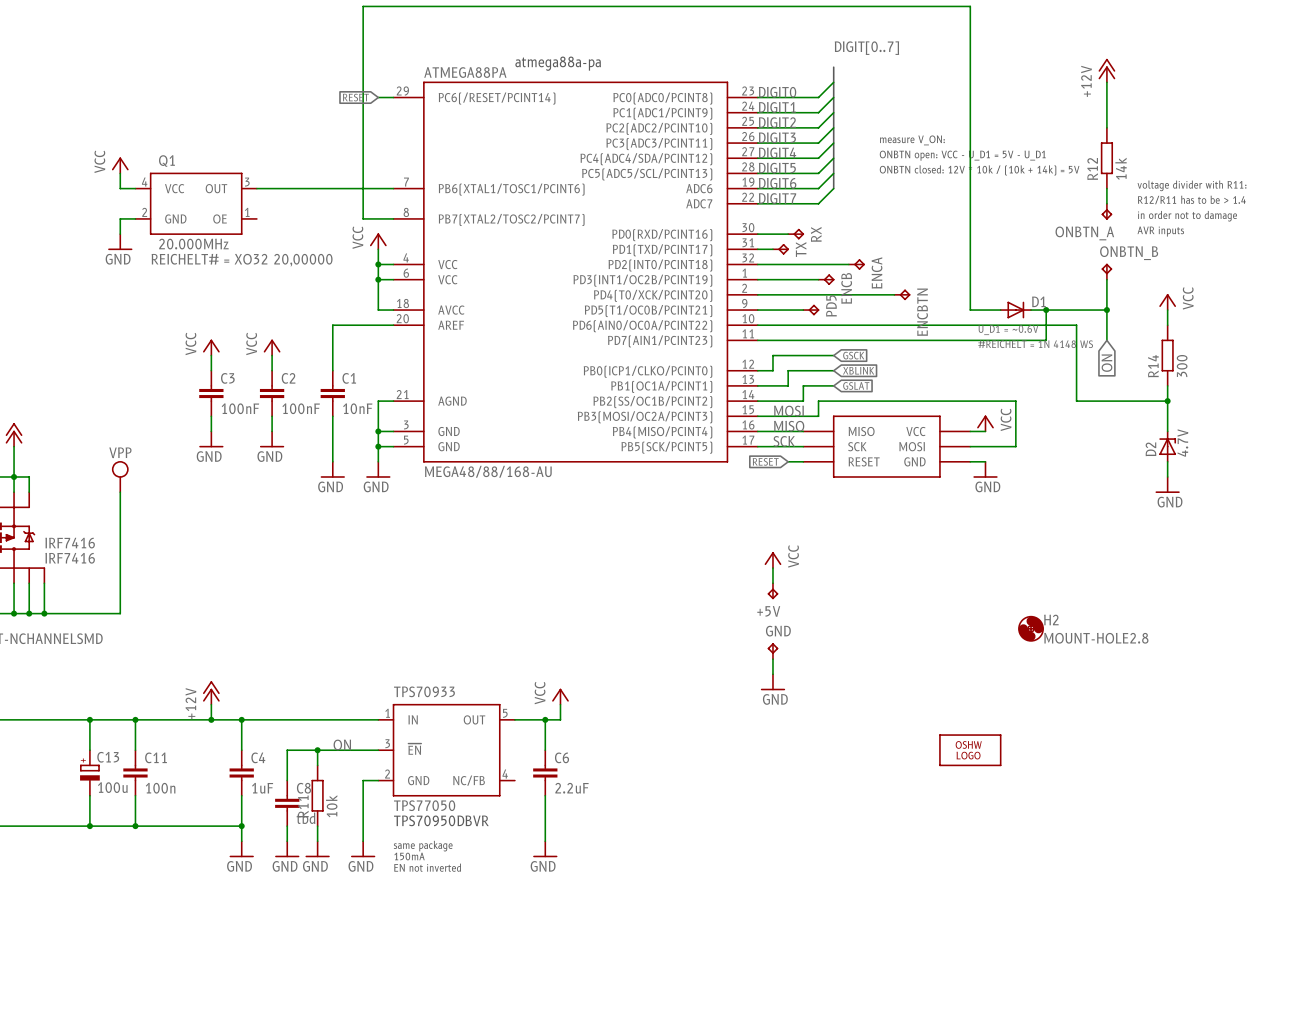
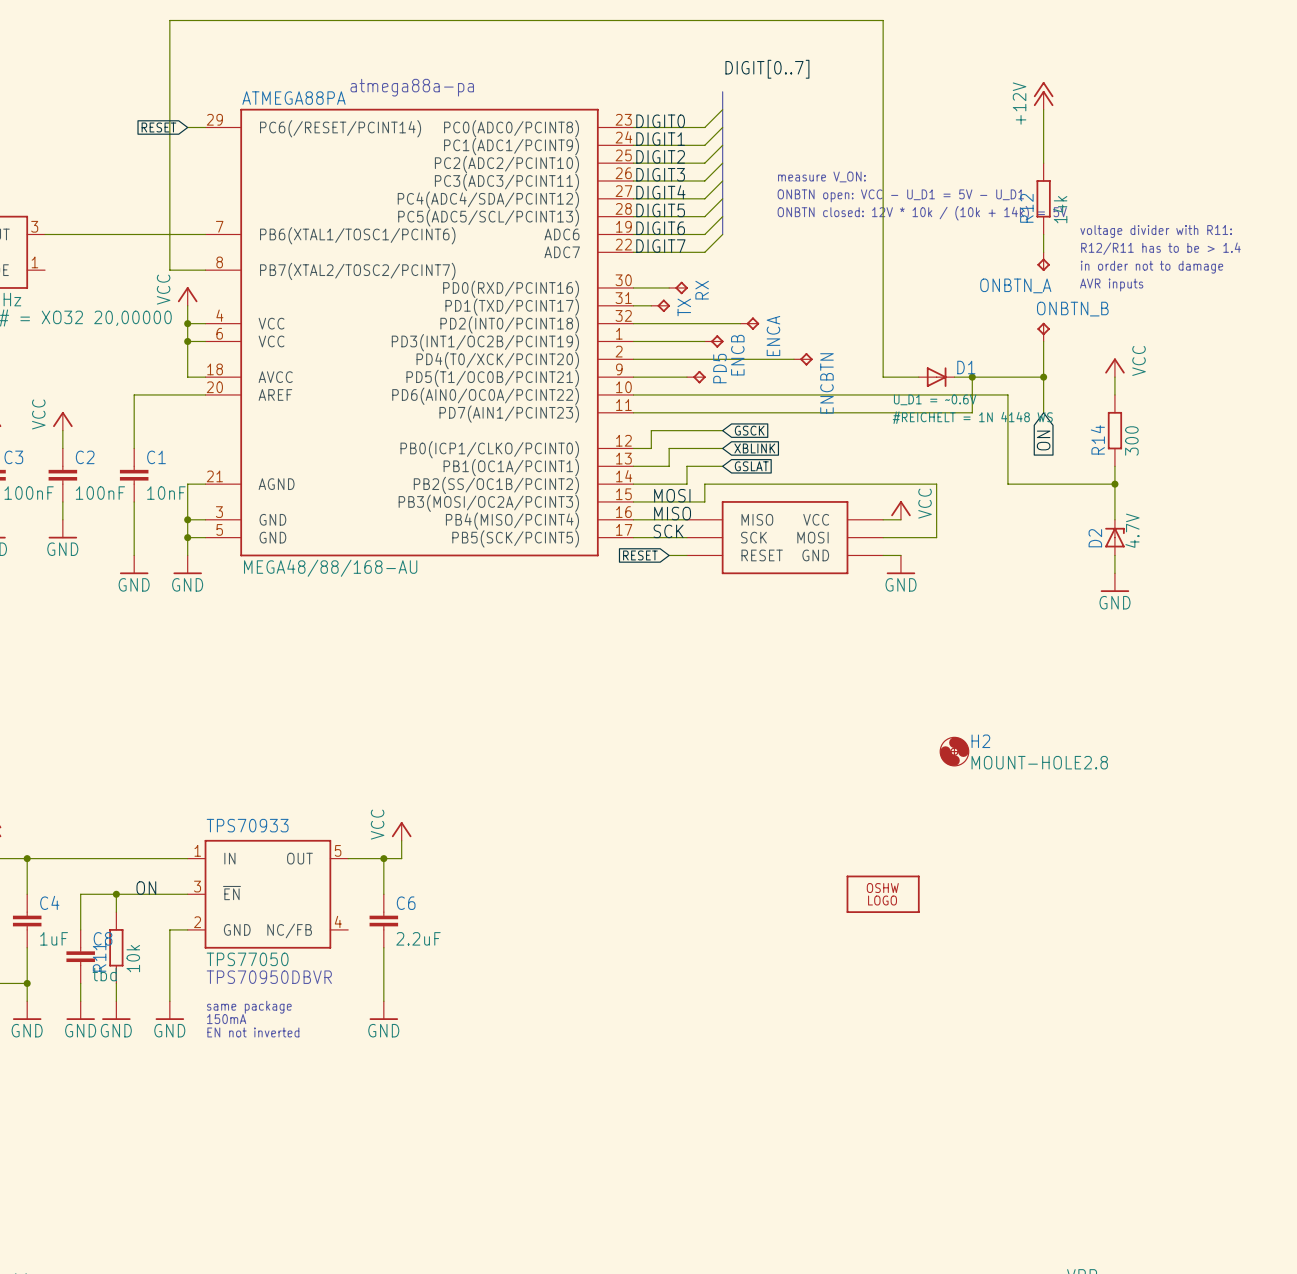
power symbol: VCC (772, 560) -> none
wire: (772, 568) (772, 583) -> none
+5V: (772, 591) -> none
GND: (772, 651) -> none
wire: (772, 659) (772, 674) -> none
power symbol: GND (772, 682) -> none

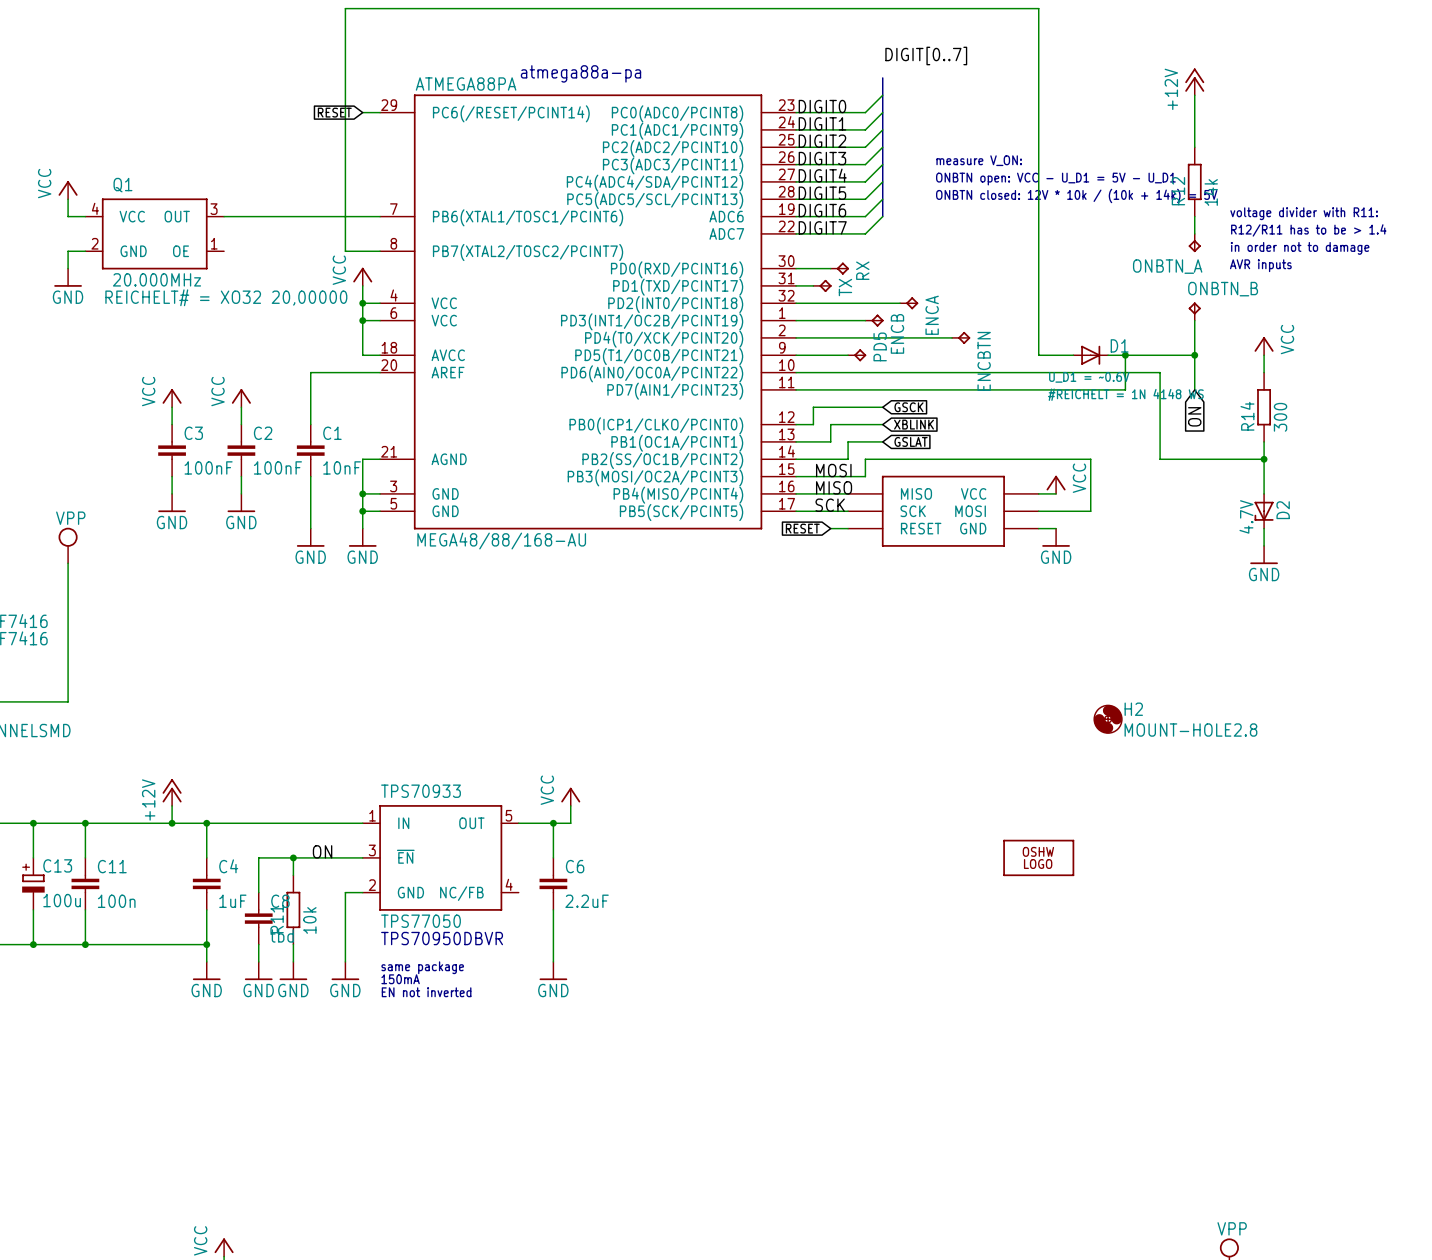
D2 rotation: 0° (1114, 537) -> 180° (1264, 511)

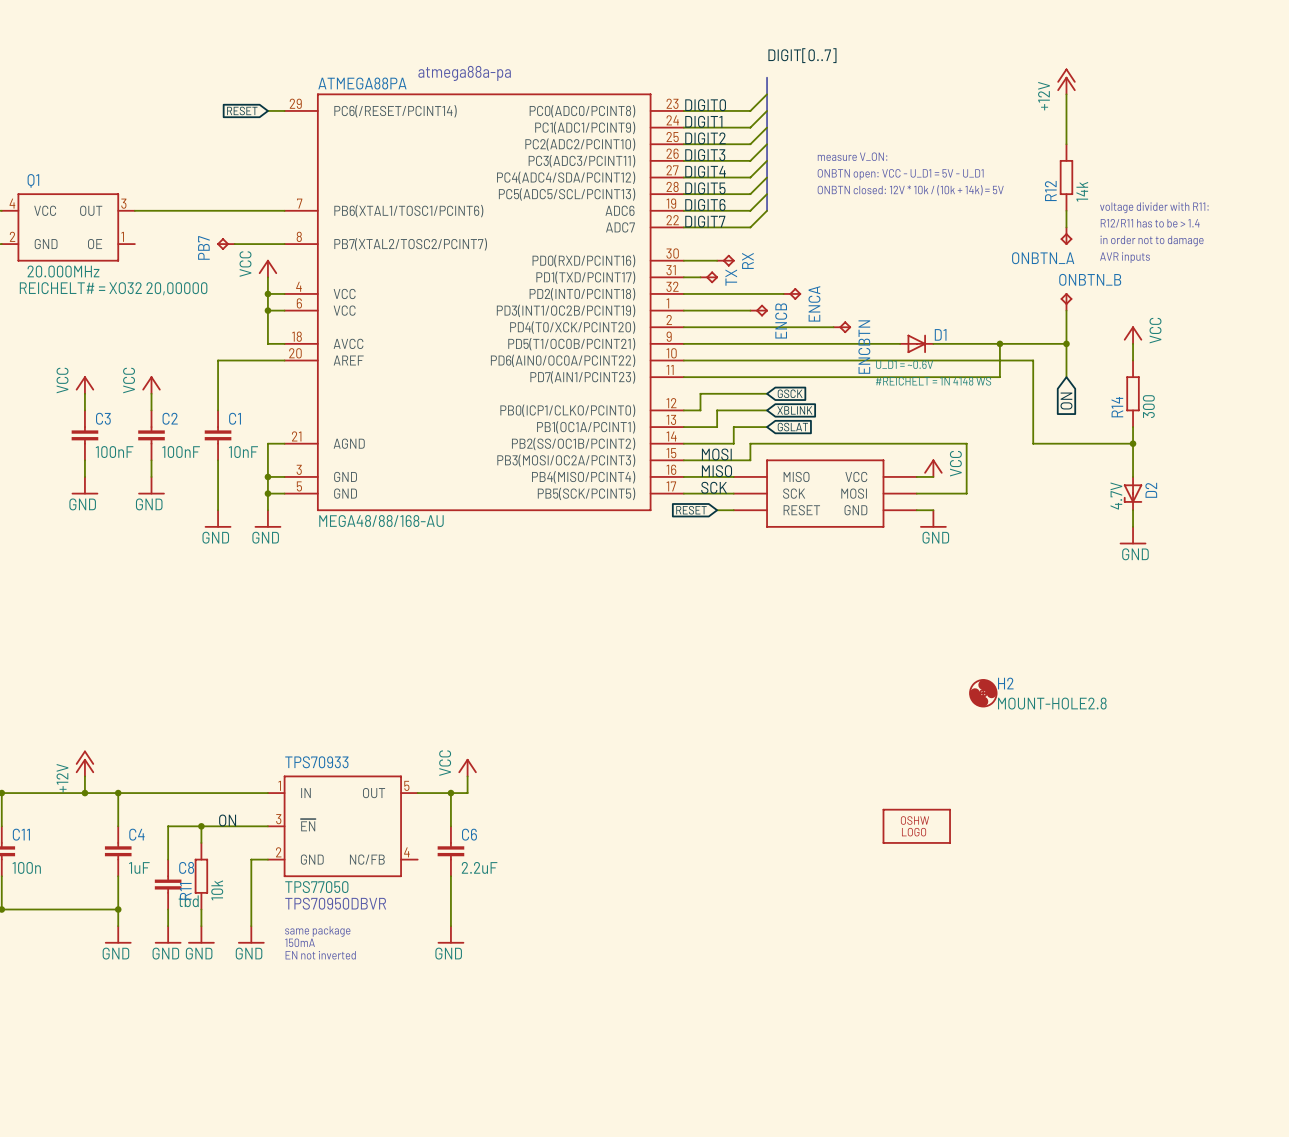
PB7: none -> (225, 244)
wire: (345, 251) (345, 8) (1038, 8) (1038, 355) (1056, 355) -> (251, 244) (234, 244)
wire: none -> (733, 343) (900, 343)
PD5: (857, 355) -> none
D1 position: (1090, 355) -> (916, 343)

